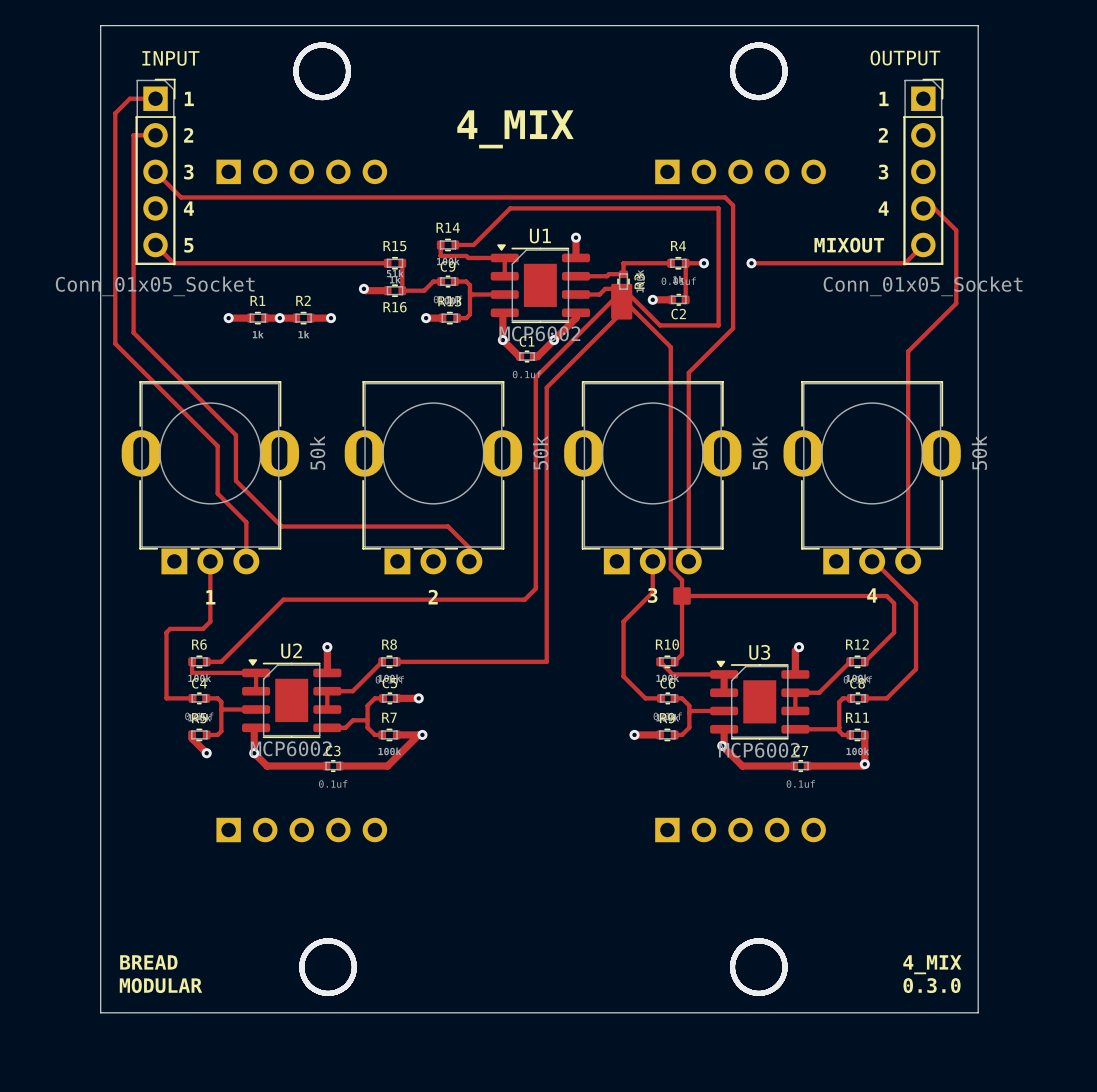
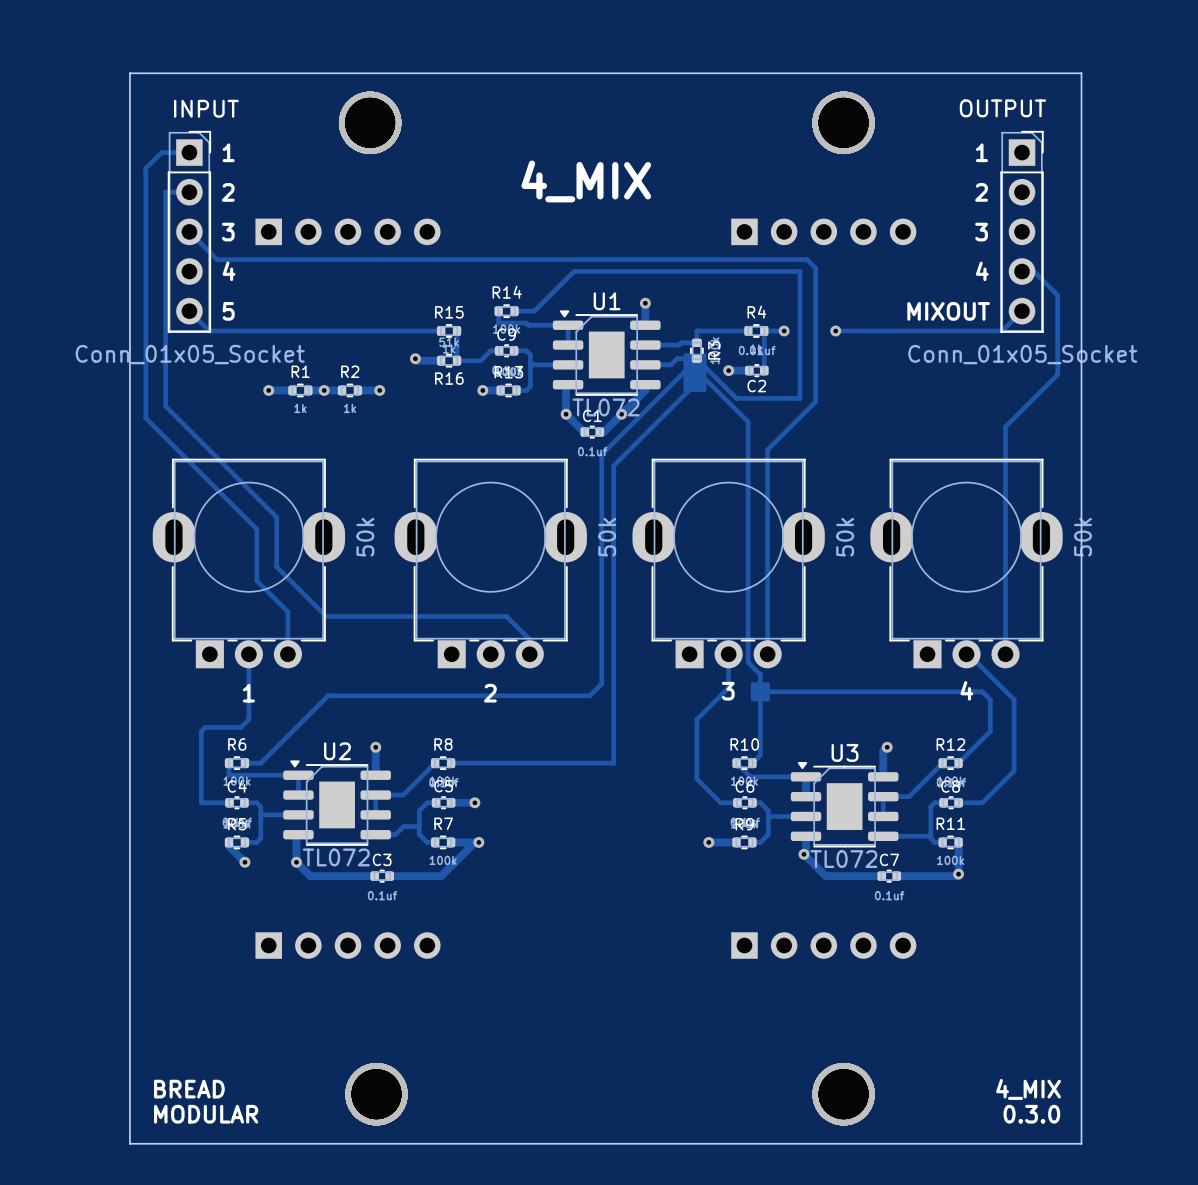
U1 value: MCP6002 (539, 333) -> TL072 (606, 407)
U2 value: MCP6002 (291, 748) -> TL072 (336, 857)
U3 value: MCP6002 (759, 750) -> TL072 (843, 859)

